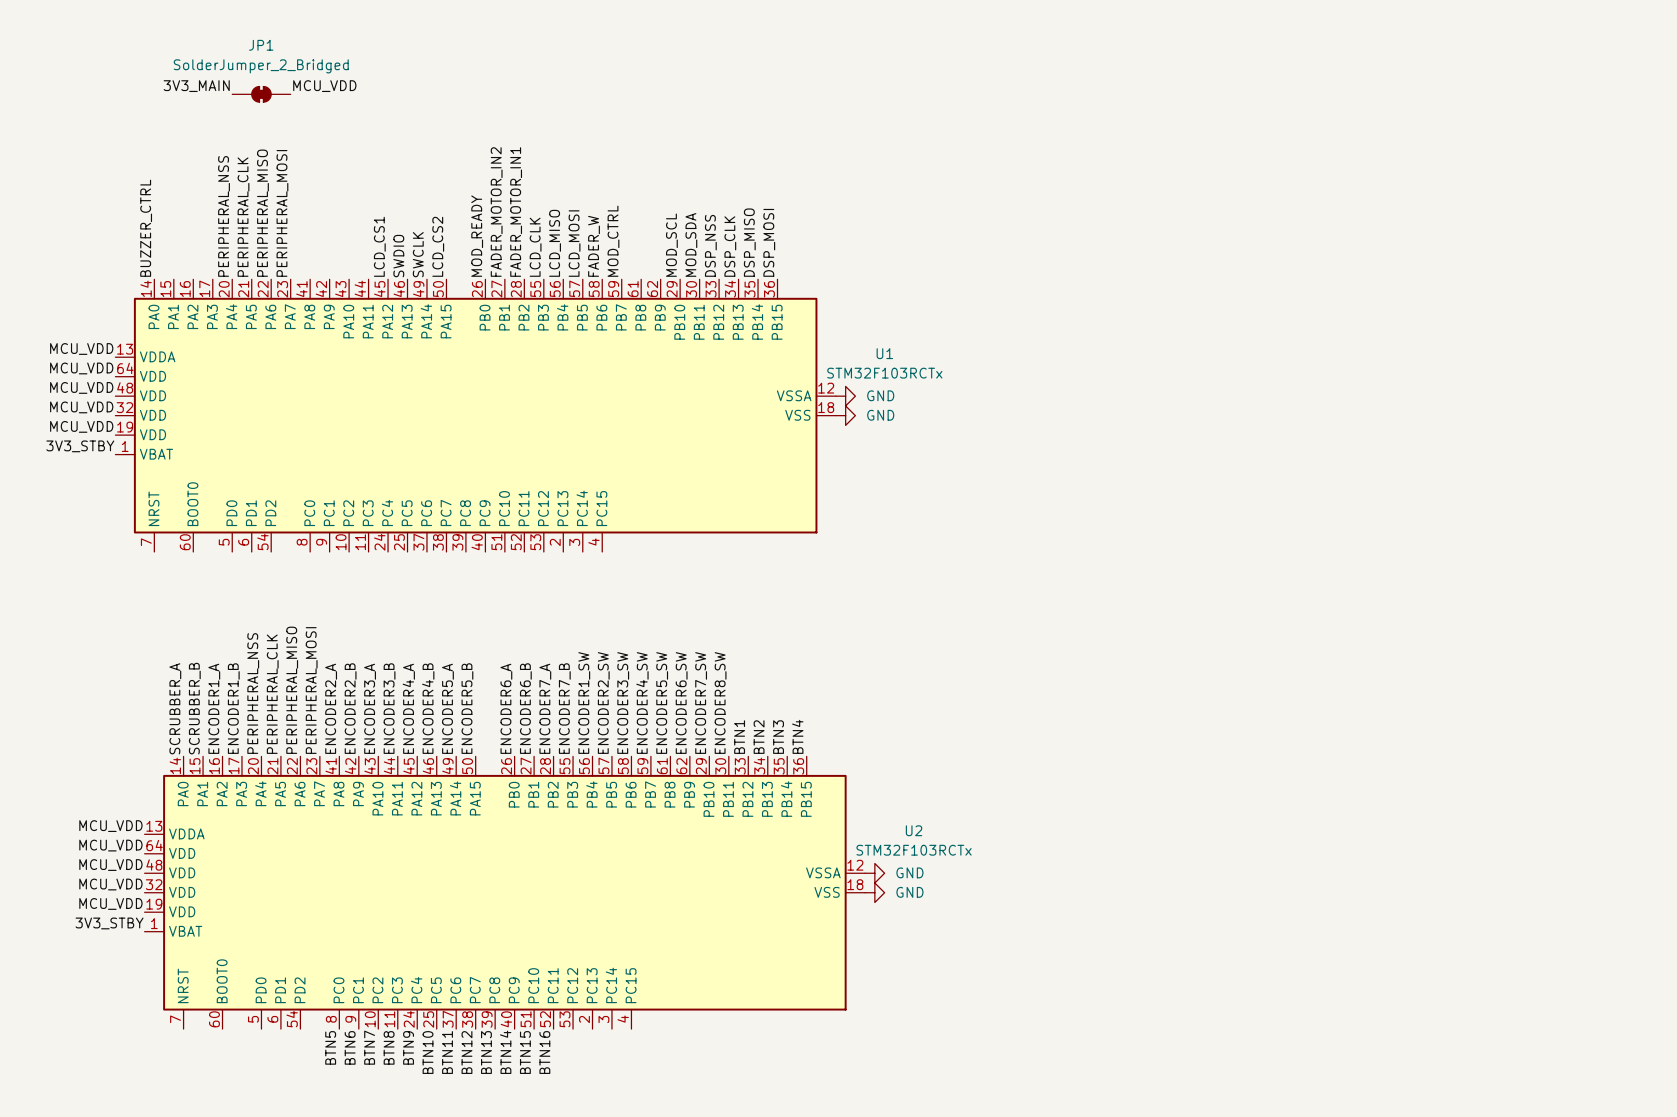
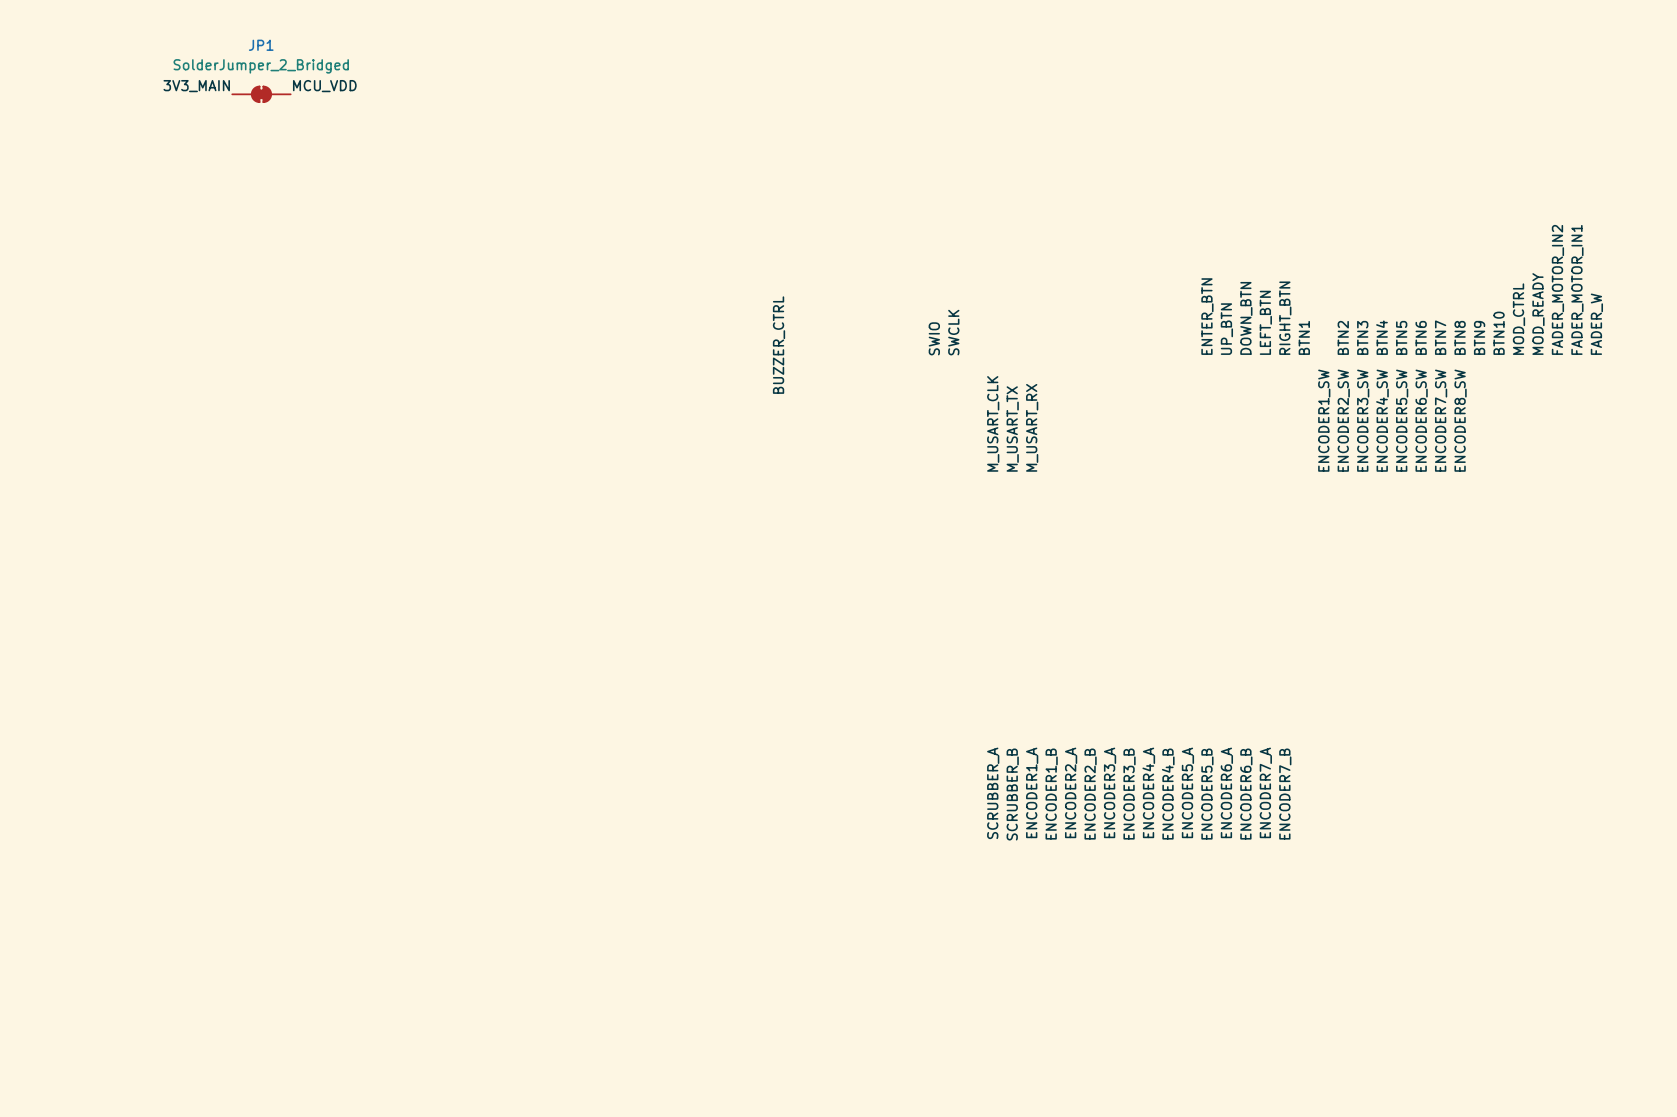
label: FADER_MOTOR_IN2 (496, 212) -> none
label: FADER_MOTOR_IN1 (516, 212) -> none
label: PERIPHERAL_MISO (262, 213) -> none
label: PERIPHERAL_MOSI (282, 213) -> none
label: PERIPHERAL_NSS (224, 216) -> none
label: PERIPHERAL_CLK (243, 217) -> none
label: BUZZER_CTRL (146, 228) -> none
label: MOD_READY (477, 236) -> none
label: MOD_CTRL (613, 241) -> none
label: DSP_MISO (749, 242) -> none
label: DSP_MOSI (769, 242) -> none
label: LCD_MISO (555, 243) -> none
label: LCD_MOSI (574, 243) -> none
label: MOD_SDA (691, 244) -> none
label: MOD_SCL (671, 245) -> none
label: DSP_NSS (710, 245) -> none
label: LCD_CS1 (379, 246) -> none
label: LCD_CS2 (438, 246) -> none
label: FADER_W (594, 246) -> none
label: DSP_CLK (730, 246) -> none
label: LCD_CLK (535, 247) -> none
label: SWCLK (418, 254) -> none
label: SWDIO (398, 256) -> none
label: none -> FADER_MOTOR_IN2 (1557, 289)
label: none -> FADER_MOTOR_IN1 (1577, 289)
label: none -> MOD_READY (1538, 314)
label: none -> ENTER_BTN (1207, 316)
label: none -> DOWN_BTN (1246, 318)
label: none -> RIGHT_BTN (1285, 318)
label: none -> MOD_CTRL (1518, 319)
label: none -> LEFT_BTN (1265, 322)
label: none -> FADER_W (1596, 324)
label: none -> UP_BTN (1226, 329)
label: none -> SWCLK (953, 332)
label: none -> BTN10 (1499, 333)
label: none -> BTN1 (1304, 337)
label: none -> BTN2 (1343, 337)
label: none -> BTN3 (1362, 337)
label: none -> BTN4 (1381, 337)
label: none -> BTN5 (1401, 337)
label: none -> BTN6 (1421, 337)
label: none -> BTN7 (1440, 337)
label: none -> BTN8 (1460, 337)
label: none -> BTN9 (1479, 337)
label: none -> SWIO (934, 338)
label: none -> BUZZER_CTRL (779, 345)
label: MCU_VDD (81, 348) -> none
label: MCU_VDD (81, 368) -> none
label: MCU_VDD (81, 387) -> none
power symbol: GND (845, 396) -> none
label: MCU_VDD (81, 407) -> none
U1: STM32F103RCTx (475, 415) -> none
power symbol: GND (845, 415) -> none
label: none -> ENCODER1_SW (1324, 420)
label: none -> ENCODER2_SW (1343, 420)
label: none -> ENCODER3_SW (1363, 420)
label: none -> ENCODER4_SW (1382, 420)
label: none -> ENCODER5_SW (1402, 420)
label: none -> ENCODER6_SW (1421, 420)
label: none -> ENCODER7_SW (1441, 420)
label: none -> ENCODER8_SW (1460, 420)
label: none -> M_USART_CLK (993, 423)
label: MCU_VDD (81, 426) -> none
label: none -> M_USART_RX (1032, 427)
label: none -> M_USART_TX (1012, 429)
label: 3V3_STBY (80, 446) -> none
label: PERIPHERAL_MISO (292, 690) -> none
label: PERIPHERAL_MOSI (311, 690) -> none
label: PERIPHERAL_NSS (253, 693) -> none
label: PERIPHERAL_CLK (272, 694) -> none
label: ENCODER1_SW (584, 703) -> none
label: ENCODER2_SW (603, 703) -> none
label: ENCODER3_SW (623, 703) -> none
label: ENCODER4_SW (642, 703) -> none
label: ENCODER5_SW (662, 703) -> none
label: ENCODER6_SW (681, 703) -> none
label: ENCODER7_SW (701, 703) -> none
label: ENCODER8_SW (720, 703) -> none
label: SCRUBBER_A (175, 708) -> none
label: SCRUBBER_B (194, 708) -> none
label: ENCODER1_A (214, 708) -> none
label: ENCODER1_B (233, 708) -> none
label: ENCODER2_A (331, 708) -> none
label: ENCODER2_B (350, 708) -> none
label: ENCODER3_A (370, 708) -> none
label: ENCODER3_B (389, 708) -> none
label: ENCODER4_A (408, 708) -> none
label: ENCODER4_B (428, 708) -> none
label: ENCODER5_A (447, 708) -> none
label: ENCODER5_B (467, 708) -> none
label: ENCODER6_A (506, 708) -> none
label: ENCODER6_B (525, 708) -> none
label: ENCODER7_A (545, 708) -> none
label: ENCODER7_B (564, 708) -> none
label: BTN4 (797, 736) -> none
label: BTN1 (739, 737) -> none
label: BTN2 (759, 737) -> none
label: BTN3 (778, 737) -> none
label: none -> ENCODER1_A (1032, 792)
label: none -> ENCODER2_A (1071, 792)
label: none -> ENCODER3_A (1110, 792)
label: none -> ENCODER4_A (1148, 792)
label: none -> ENCODER5_A (1187, 792)
label: none -> ENCODER6_A (1226, 792)
label: none -> ENCODER7_A (1265, 792)
label: none -> SCRUBBER_A (993, 793)
label: none -> SCRUBBER_B (1012, 794)
label: none -> ENCODER1_B (1051, 794)
label: none -> ENCODER2_B (1090, 794)
label: none -> ENCODER3_B (1129, 794)
label: none -> ENCODER4_B (1168, 794)
label: none -> ENCODER5_B (1207, 794)
label: none -> ENCODER6_B (1246, 794)
label: none -> ENCODER7_B (1285, 794)
label: MCU_VDD (110, 826) -> none
label: MCU_VDD (110, 845) -> none
label: MCU_VDD (110, 865) -> none
power symbol: GND (874, 873) -> none
label: MCU_VDD (110, 884) -> none
U2: STM32F103RCTx (504, 892) -> none
power symbol: GND (874, 892) -> none
label: MCU_VDD (110, 903) -> none
label: 3V3_STBY (109, 923) -> none
label: BTN5 (330, 1047) -> none
label: BTN6 (350, 1047) -> none
label: BTN7 (369, 1047) -> none
label: BTN8 (389, 1047) -> none
label: BTN9 (408, 1047) -> none
label: BTN10 (428, 1052) -> none
label: BTN11 (447, 1052) -> none
label: BTN12 (466, 1052) -> none
label: BTN13 (486, 1052) -> none
label: BTN14 (505, 1052) -> none
label: BTN15 (525, 1052) -> none
label: BTN16 (544, 1052) -> none

